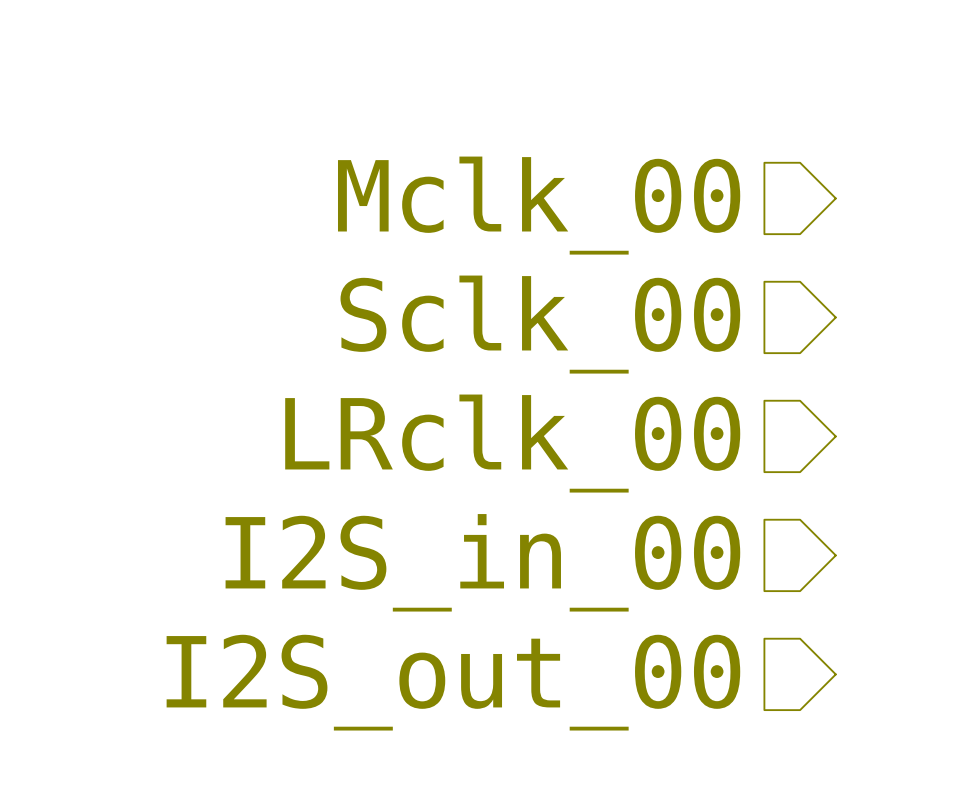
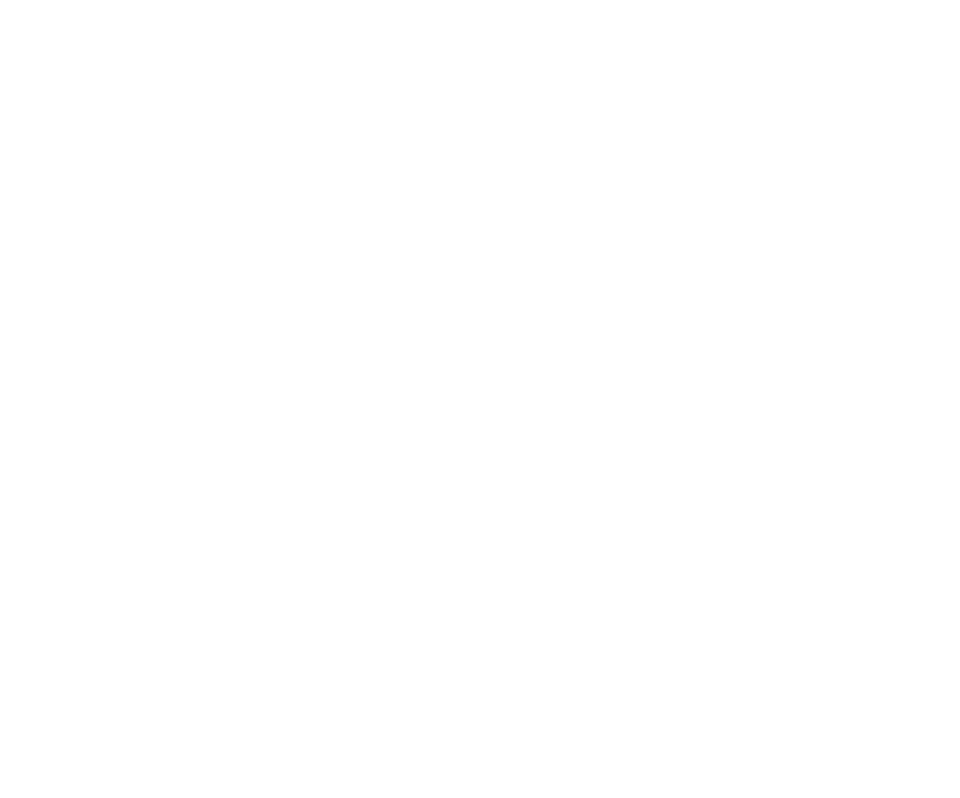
hierarchical label: Mclk_00 (539, 205) -> none
hierarchical label: Sclk_00 (540, 324) -> none
hierarchical label: LRclk_00 (512, 443) -> none
hierarchical label: I2S_in_00 (482, 562) -> none
hierarchical label: I2S_out_00 (453, 682) -> none

